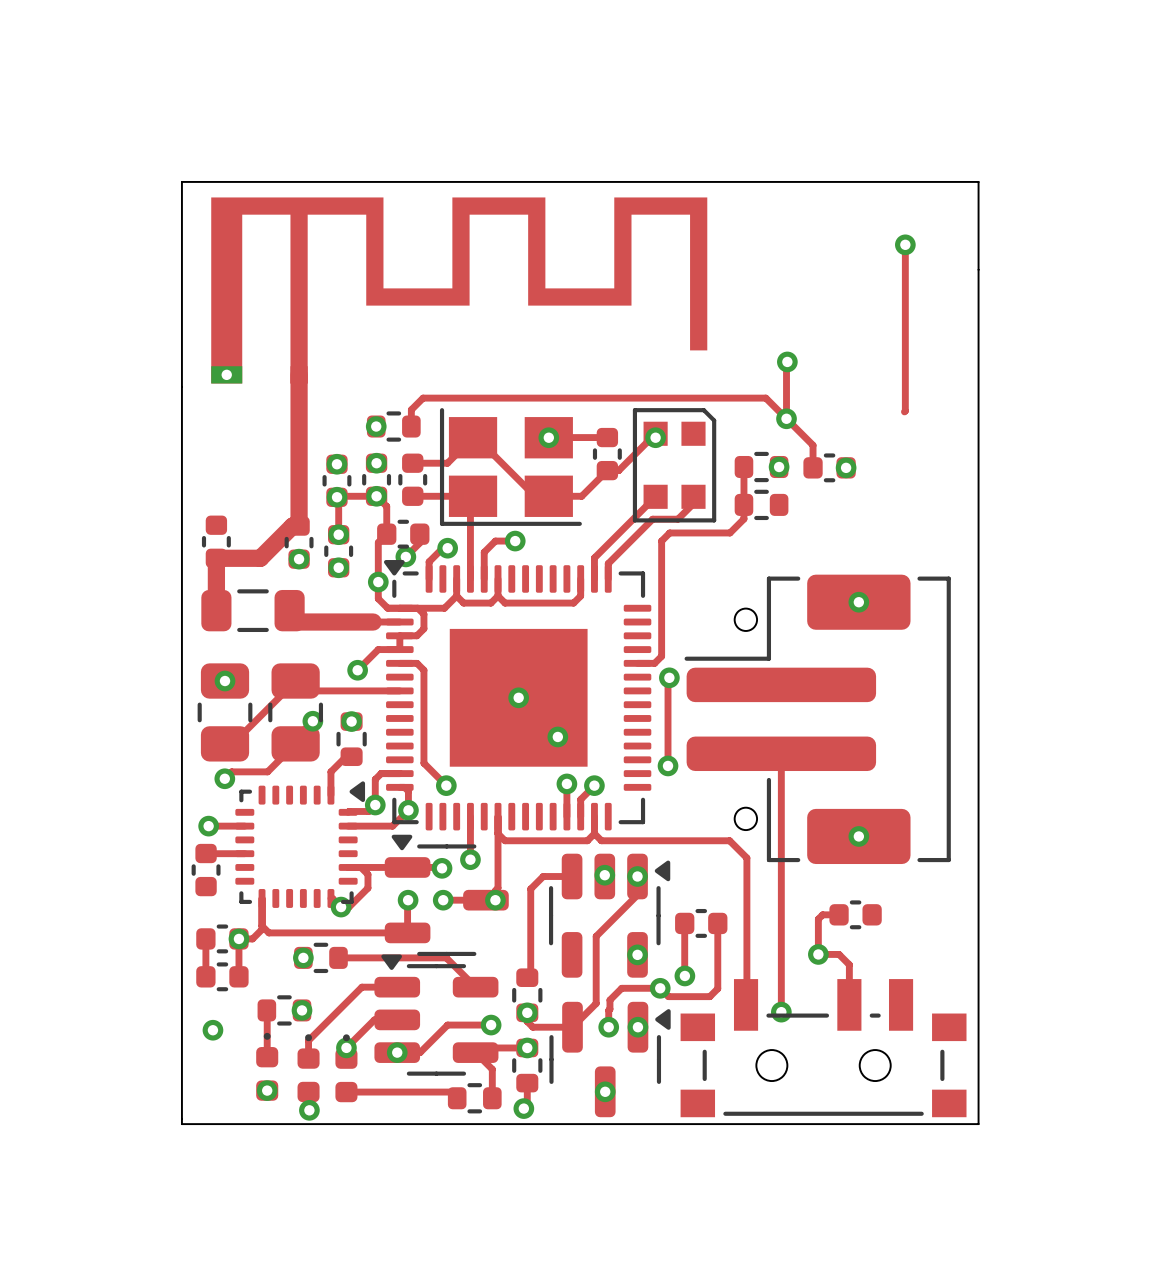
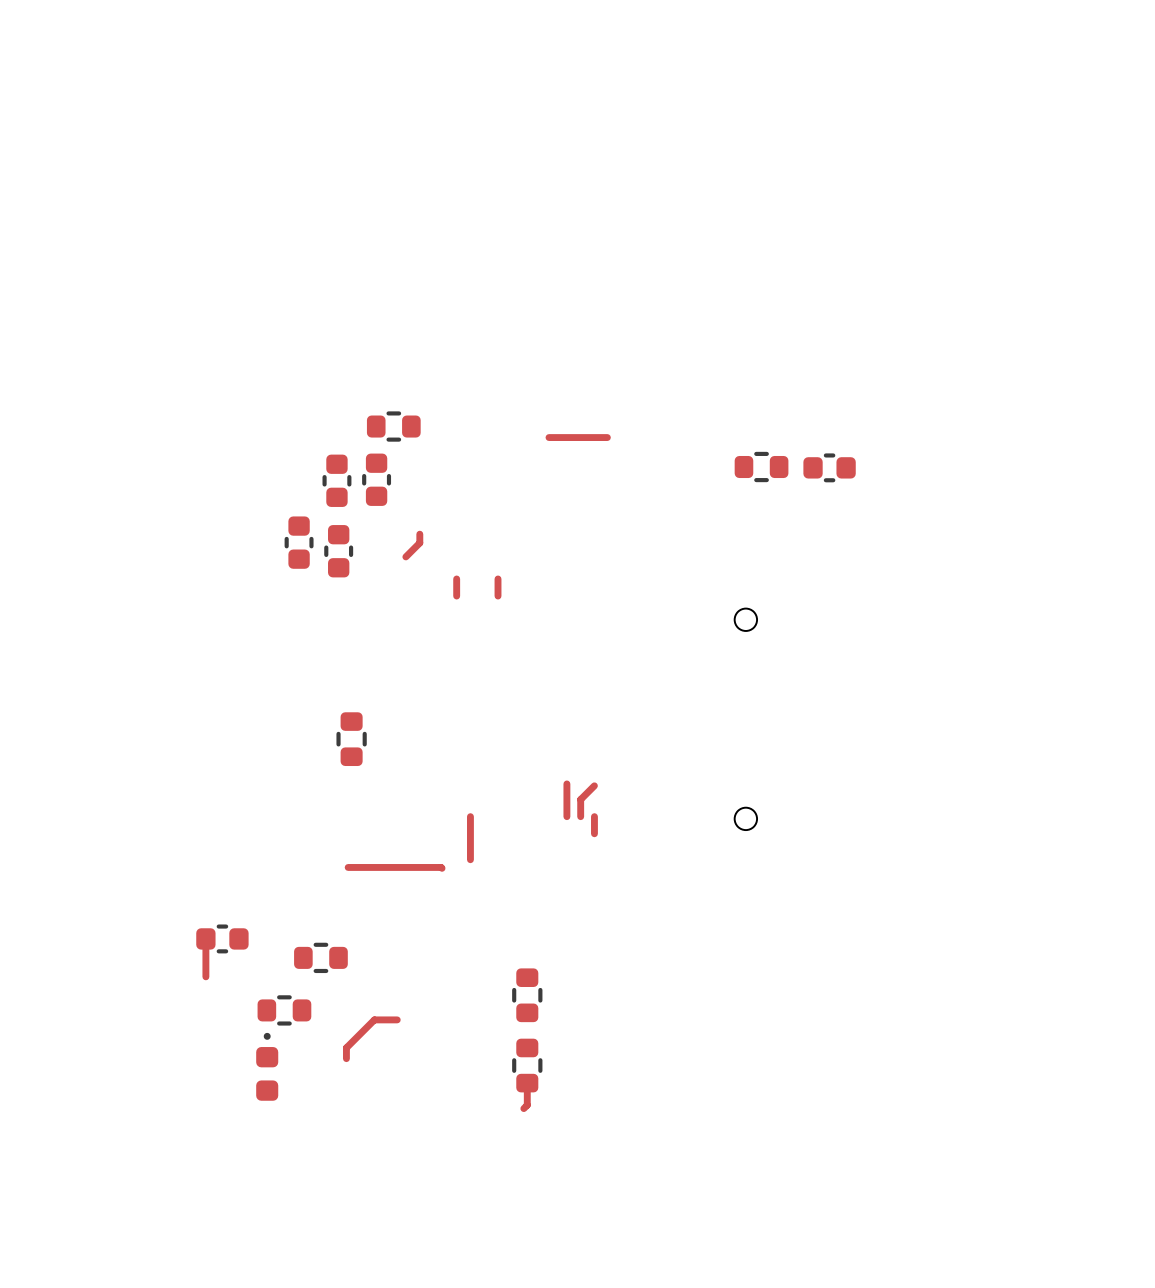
board edge: (181, 181) (181, 1124) (978, 1124) (978, 181) (181, 181) -> none
track: (905, 244) (904, 411) -> none
via: (905, 244) -> none
part: (459, 290) -> none
track: (787, 361) (787, 417) -> none
via: (787, 361) -> none
track: (299, 374) (299, 526) (292, 526) (260, 558) (216, 558) (216, 610) -> none
via: (786, 418) -> none
via: (376, 426) -> none
track: (411, 426) (411, 409) (423, 398) (765, 398) (813, 445) (813, 467) -> none
track: (655, 433) (618, 470) (607, 470) (581, 496) (535, 496) (476, 437) (473, 437) (447, 463) (412, 463) -> none
via: (548, 437) -> none
via: (655, 437) -> none
part: (607, 454) -> none
via: (376, 463) -> none
via: (336, 464) -> none
part: (674, 465) -> none
part: (510, 467) -> none
track: (743, 467) (743, 519) (730, 532) (669, 532) (661, 541) (661, 656) (654, 663) (637, 663) -> none
via: (779, 467) -> none
via: (846, 467) -> none
part: (412, 479) -> none
via: (376, 496) -> none
track: (412, 496) (473, 496) (470, 498) (470, 578) -> none
track: (655, 496) (594, 557) (594, 578) -> none
track: (693, 496) (693, 503) (678, 519) (652, 519) (608, 563) (608, 578) -> none
via: (337, 497) -> none
part: (761, 504) -> none
track: (338, 534) (338, 496) (376, 496) (386, 506) (386, 534) (378, 542) (378, 598) (387, 608) (444, 608) (456, 596) (463, 603) (490, 603) (498, 596) (505, 603) (573, 603) (580, 596) (580, 578) -> none
via: (338, 534) -> none
part: (403, 534) -> none
part: (216, 541) -> none
track: (515, 541) (495, 541) (484, 552) (484, 578) -> none
via: (515, 541) -> none
track: (447, 548) (442, 548) (429, 561) (429, 578) -> none
via: (447, 548) -> none
via: (405, 556) -> none
via: (299, 559) -> none
via: (338, 567) -> none
via: (378, 582) -> none
via: (858, 602) -> none
track: (417, 608) (423, 614) (423, 628) (416, 635) (399, 635) (399, 649) (378, 649) (357, 670) -> none
part: (253, 610) -> none
track: (289, 610) (300, 622) (399, 622) -> none
track: (399, 663) (417, 663) (423, 670) (423, 763) (446, 785) -> none
via: (357, 670) -> none
track: (669, 677) (668, 765) -> none
via: (669, 677) -> none
via: (225, 681) -> none
track: (399, 690) (305, 690) (295, 681) (232, 743) (225, 743) -> none
part: (517, 695) -> none
via: (518, 697) -> none
part: (225, 712) -> none
part: (295, 712) -> none
part: (817, 719) -> none
track: (312, 721) (295, 738) (295, 743) (267, 771) (231, 771) (224, 778) -> none
via: (312, 721) -> none
via: (351, 721) -> none
via: (557, 736) -> none
track: (781, 753) (781, 1012) -> none
track: (351, 756) (346, 756) (330, 771) (330, 795) -> none
via: (668, 765) -> none
track: (400, 773) (381, 773) (375, 779) (375, 805) (368, 811) (348, 812) -> none
via: (224, 778) -> none
via: (566, 783) -> none
via: (446, 785) -> none
via: (594, 785) -> none
track: (399, 787) (404, 787) (408, 791) (408, 810) (392, 826) (348, 826) -> none
via: (375, 805) -> none
via: (408, 810) -> none
track: (498, 816) (498, 888) (495, 890) (495, 900) (443, 900) -> none
track: (208, 826) (244, 826) -> none
via: (208, 826) -> none
track: (498, 833) (505, 840) (587, 840) (594, 833) (601, 840) (729, 840) (746, 857) (746, 1004) -> none
via: (858, 836) -> none
part: (300, 844) -> none
track: (206, 853) (244, 853) -> none
via: (470, 859) -> none
track: (360, 867) (367, 874) (367, 888) (349, 907) (341, 907) (330, 898) -> none
via: (442, 868) -> none
part: (206, 870) -> none
via: (604, 875) -> none
track: (572, 876) (543, 876) (530, 888) (530, 974) (527, 977) -> none
track: (637, 876) (637, 895) (596, 936) (596, 1003) (572, 1027) (532, 1027) (527, 1021) (527, 1012) -> none
via: (637, 876) -> none
part: (446, 895) -> none
track: (262, 898) (262, 929) (252, 938) (238, 938) (238, 976) -> none
track: (408, 900) (407, 932) (268, 932) (262, 926) -> none
via: (408, 900) -> none
via: (443, 900) -> none
via: (495, 900) -> none
via: (341, 907) -> none
track: (839, 914) (822, 914) (818, 919) (818, 954) (839, 954) (849, 964) (849, 1004) -> none
part: (855, 914) -> none
part: (609, 915) -> none
track: (684, 923) (684, 975) -> none
part: (701, 923) -> none
track: (717, 923) (717, 988) (709, 996) (668, 996) (660, 988) (621, 988) (609, 1000) (608, 1027) -> none
via: (238, 938) -> none
via: (637, 954) -> none
via: (818, 954) -> none
via: (303, 957) -> none
track: (338, 957) (446, 957) (475, 987) -> none
via: (684, 975) -> none
part: (222, 976) -> none
track: (397, 987) (361, 987) (308, 1040) (308, 1058) -> none
via: (660, 988) -> none
track: (267, 1010) (267, 1057) -> none
via: (302, 1010) -> none
via: (527, 1012) -> none
via: (781, 1012) -> none
part: (436, 1015) -> none
track: (491, 1025) (447, 1025) (420, 1052) (397, 1052) -> none
via: (491, 1025) -> none
via: (608, 1027) -> none
via: (637, 1027) -> none
via: (212, 1030) -> none
via: (346, 1047) -> none
track: (527, 1047) (480, 1047) (475, 1052) (492, 1069) (492, 1098) -> none
via: (527, 1047) -> none
part: (823, 1048) -> none
via: (397, 1052) -> none
part: (610, 1059) -> none
part: (308, 1068) -> none
part: (346, 1068) -> none
via: (267, 1090) -> none
via: (605, 1091) -> none
track: (346, 1092) (450, 1092) (457, 1098) -> none
part: (474, 1098) -> none
via: (523, 1108) -> none
via: (309, 1110) -> none

